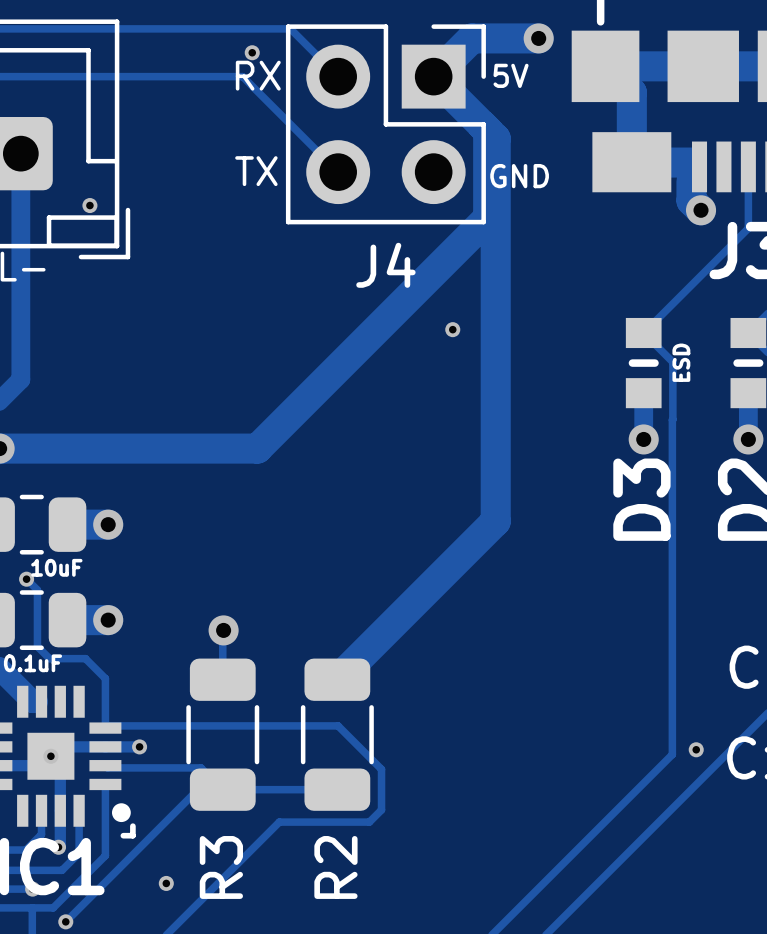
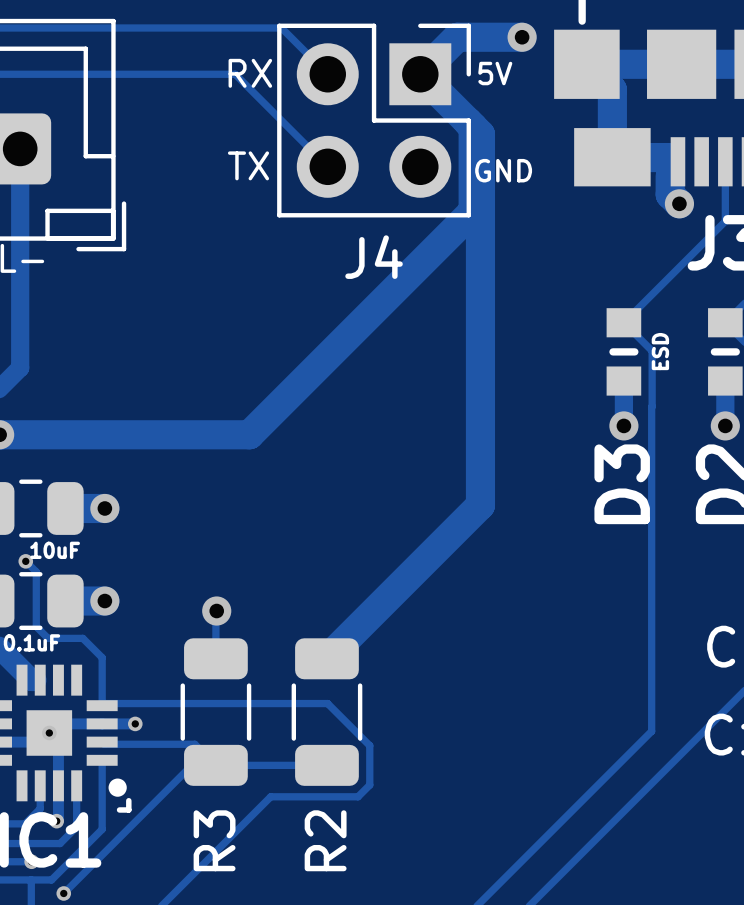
via: (252, 52) -> none
via: (89, 205) -> none
via: (452, 329) -> none
via: (696, 749) -> none
via: (166, 883) -> none

